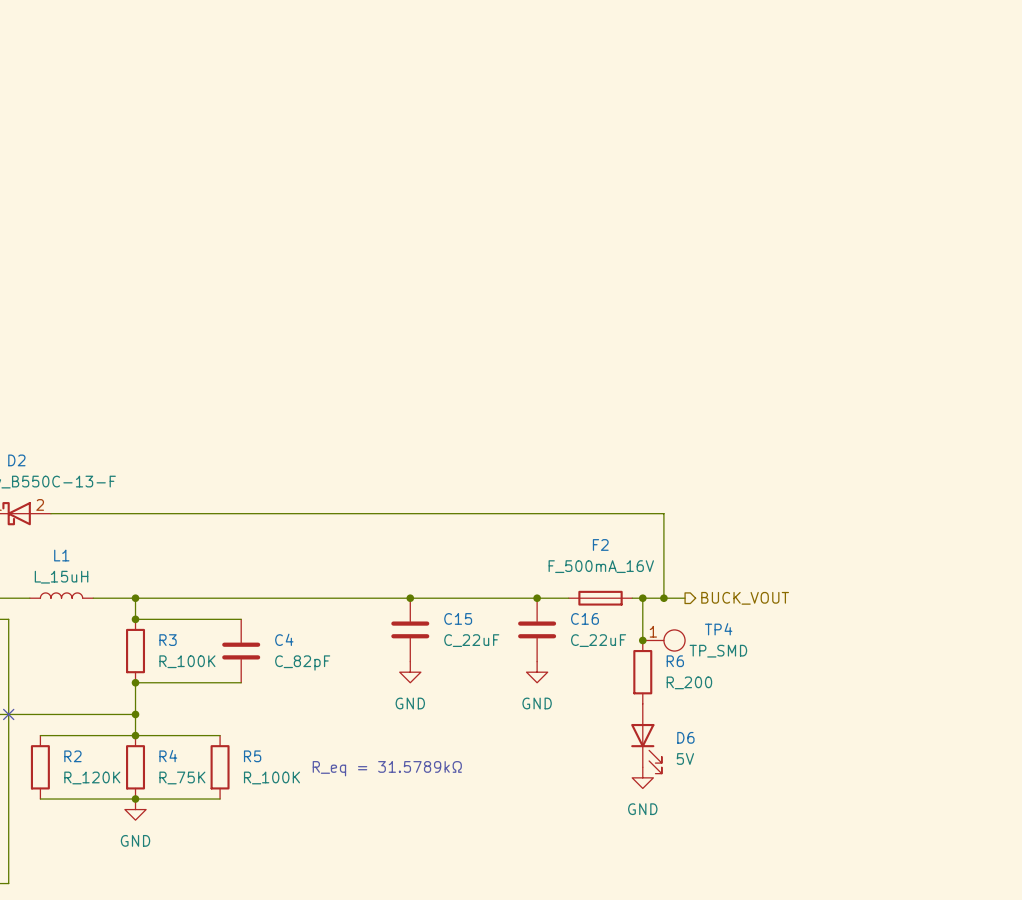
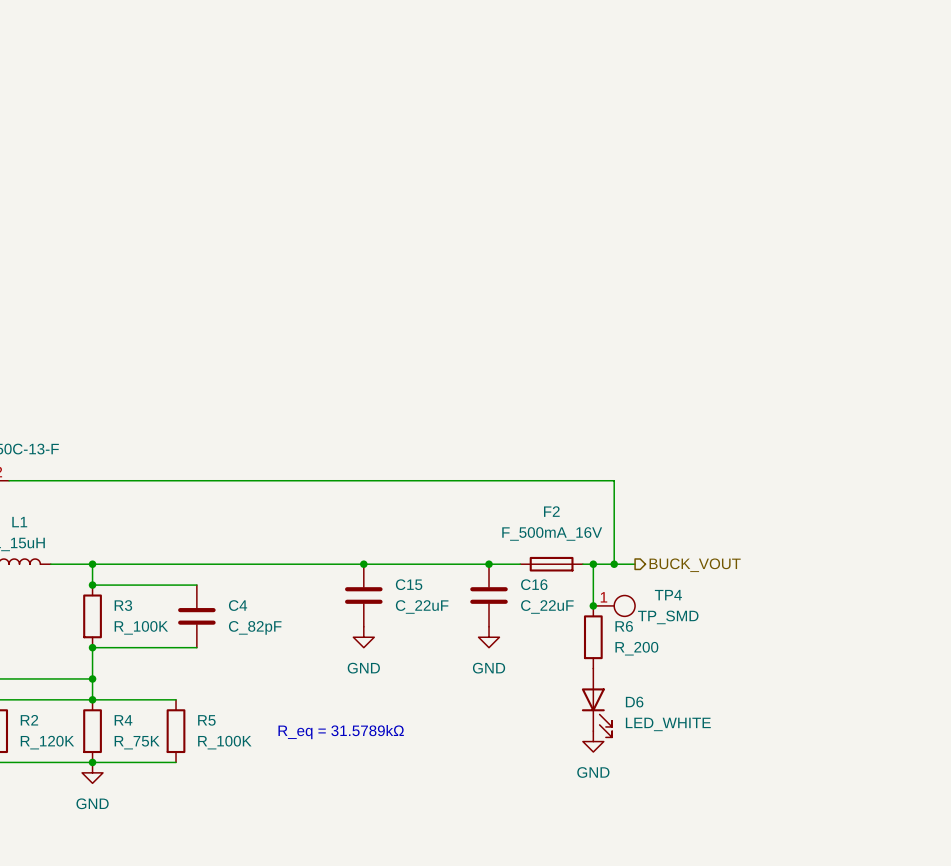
D6 value: 5V (685, 758) -> LED_WHITE (668, 724)

